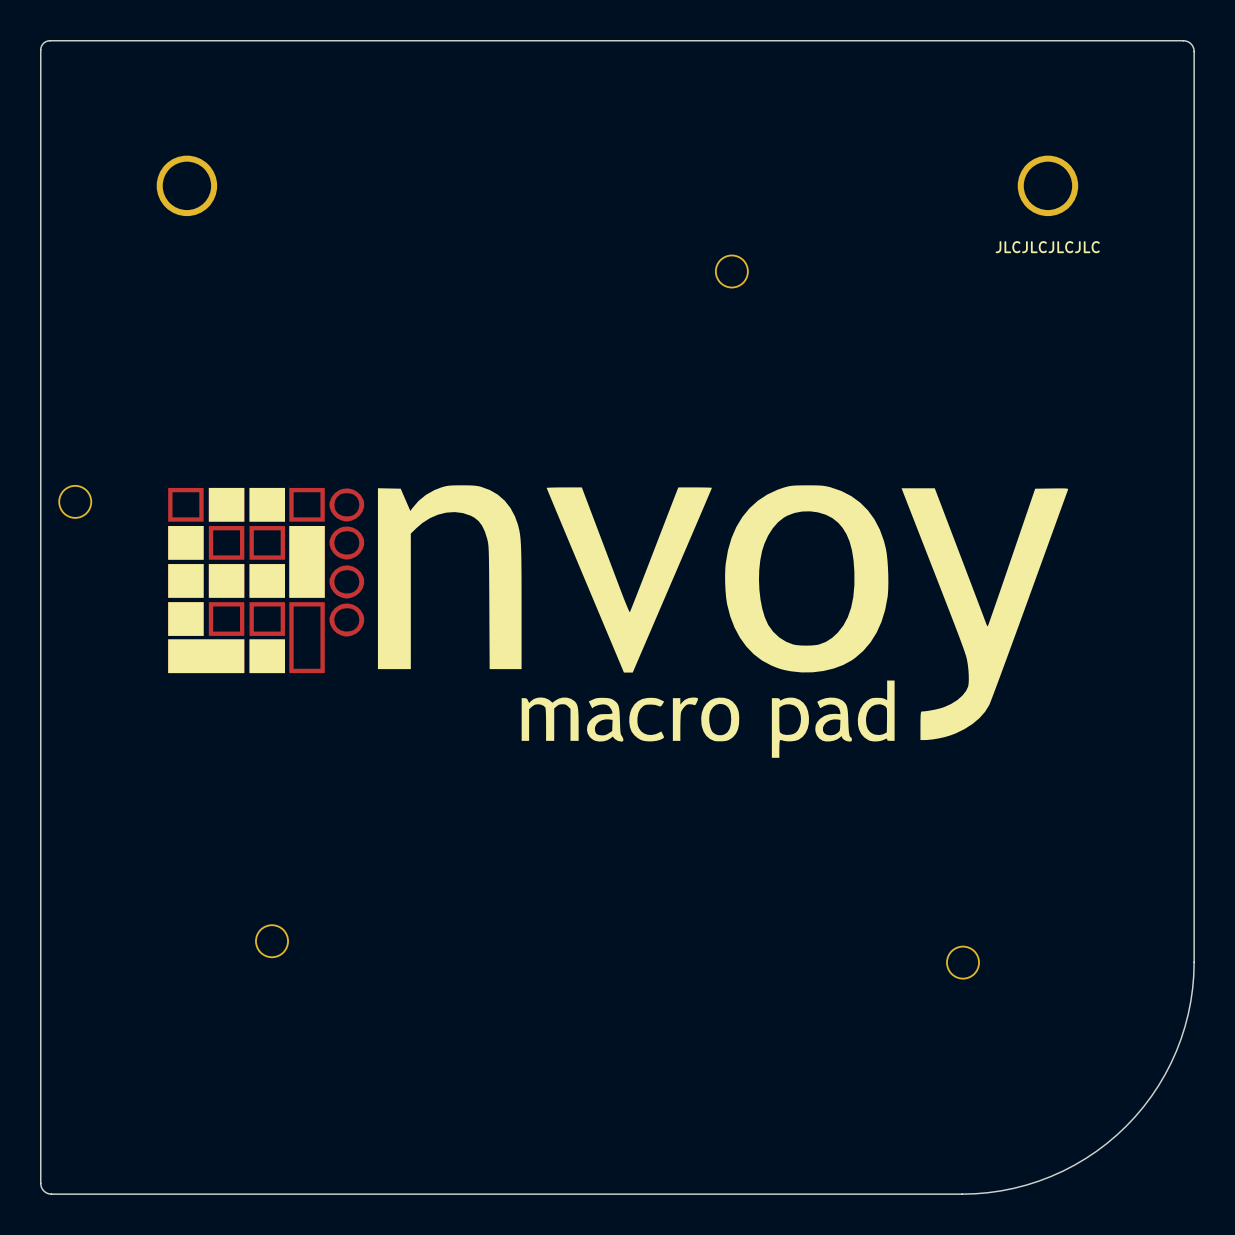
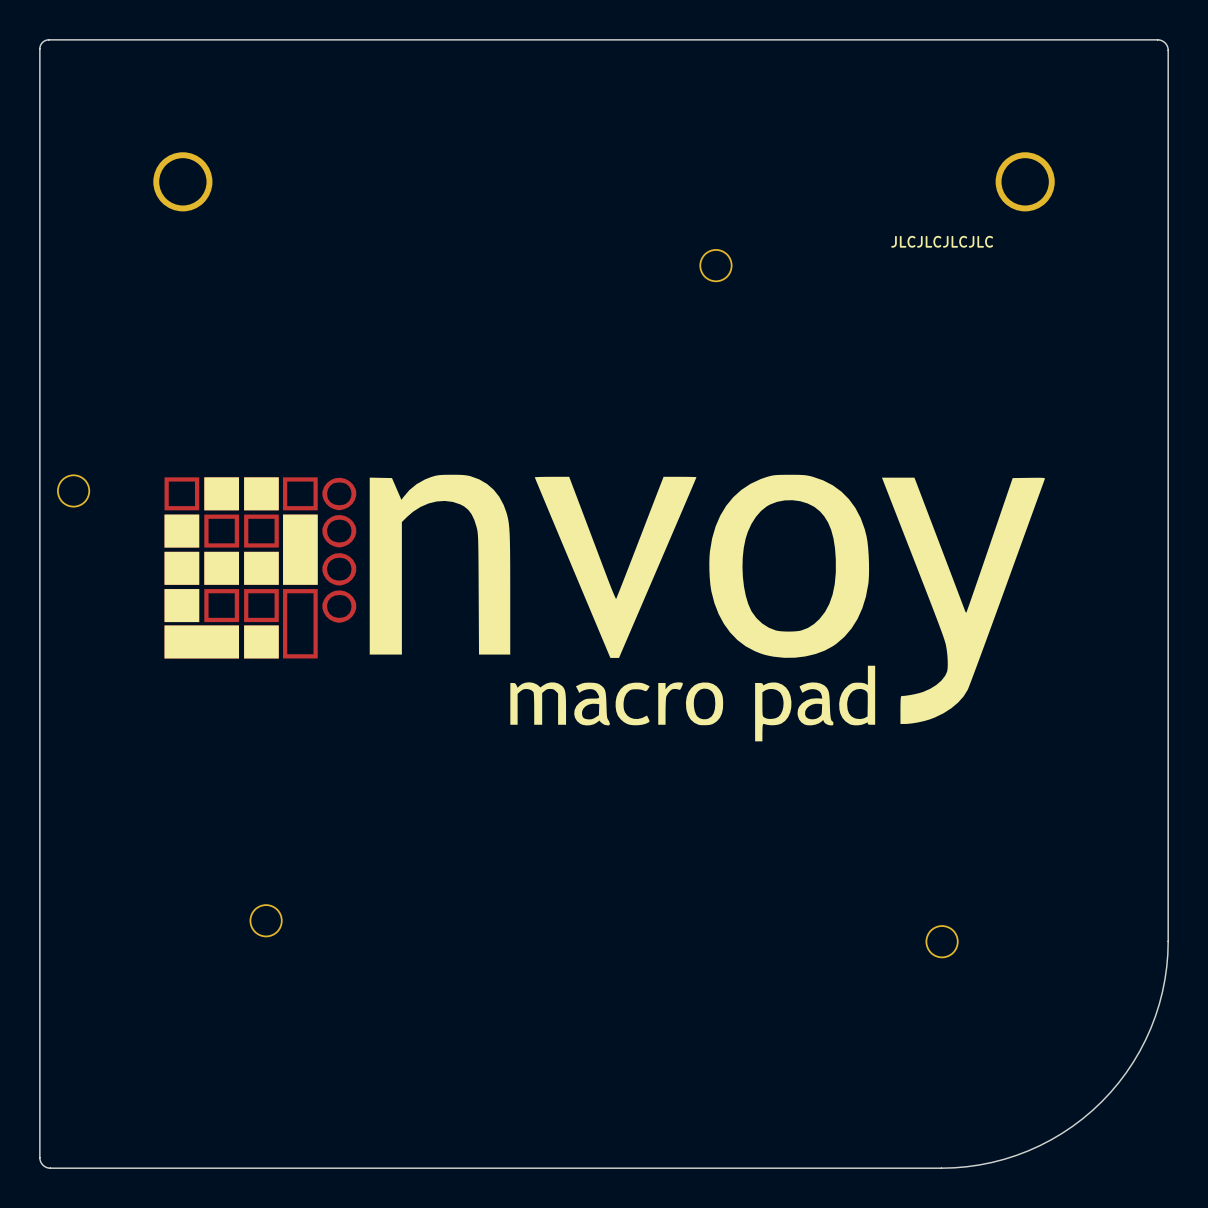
text position: JLCJLCJLCJLC (1047, 247) -> JLCJLCJLCJLC (942, 241)

